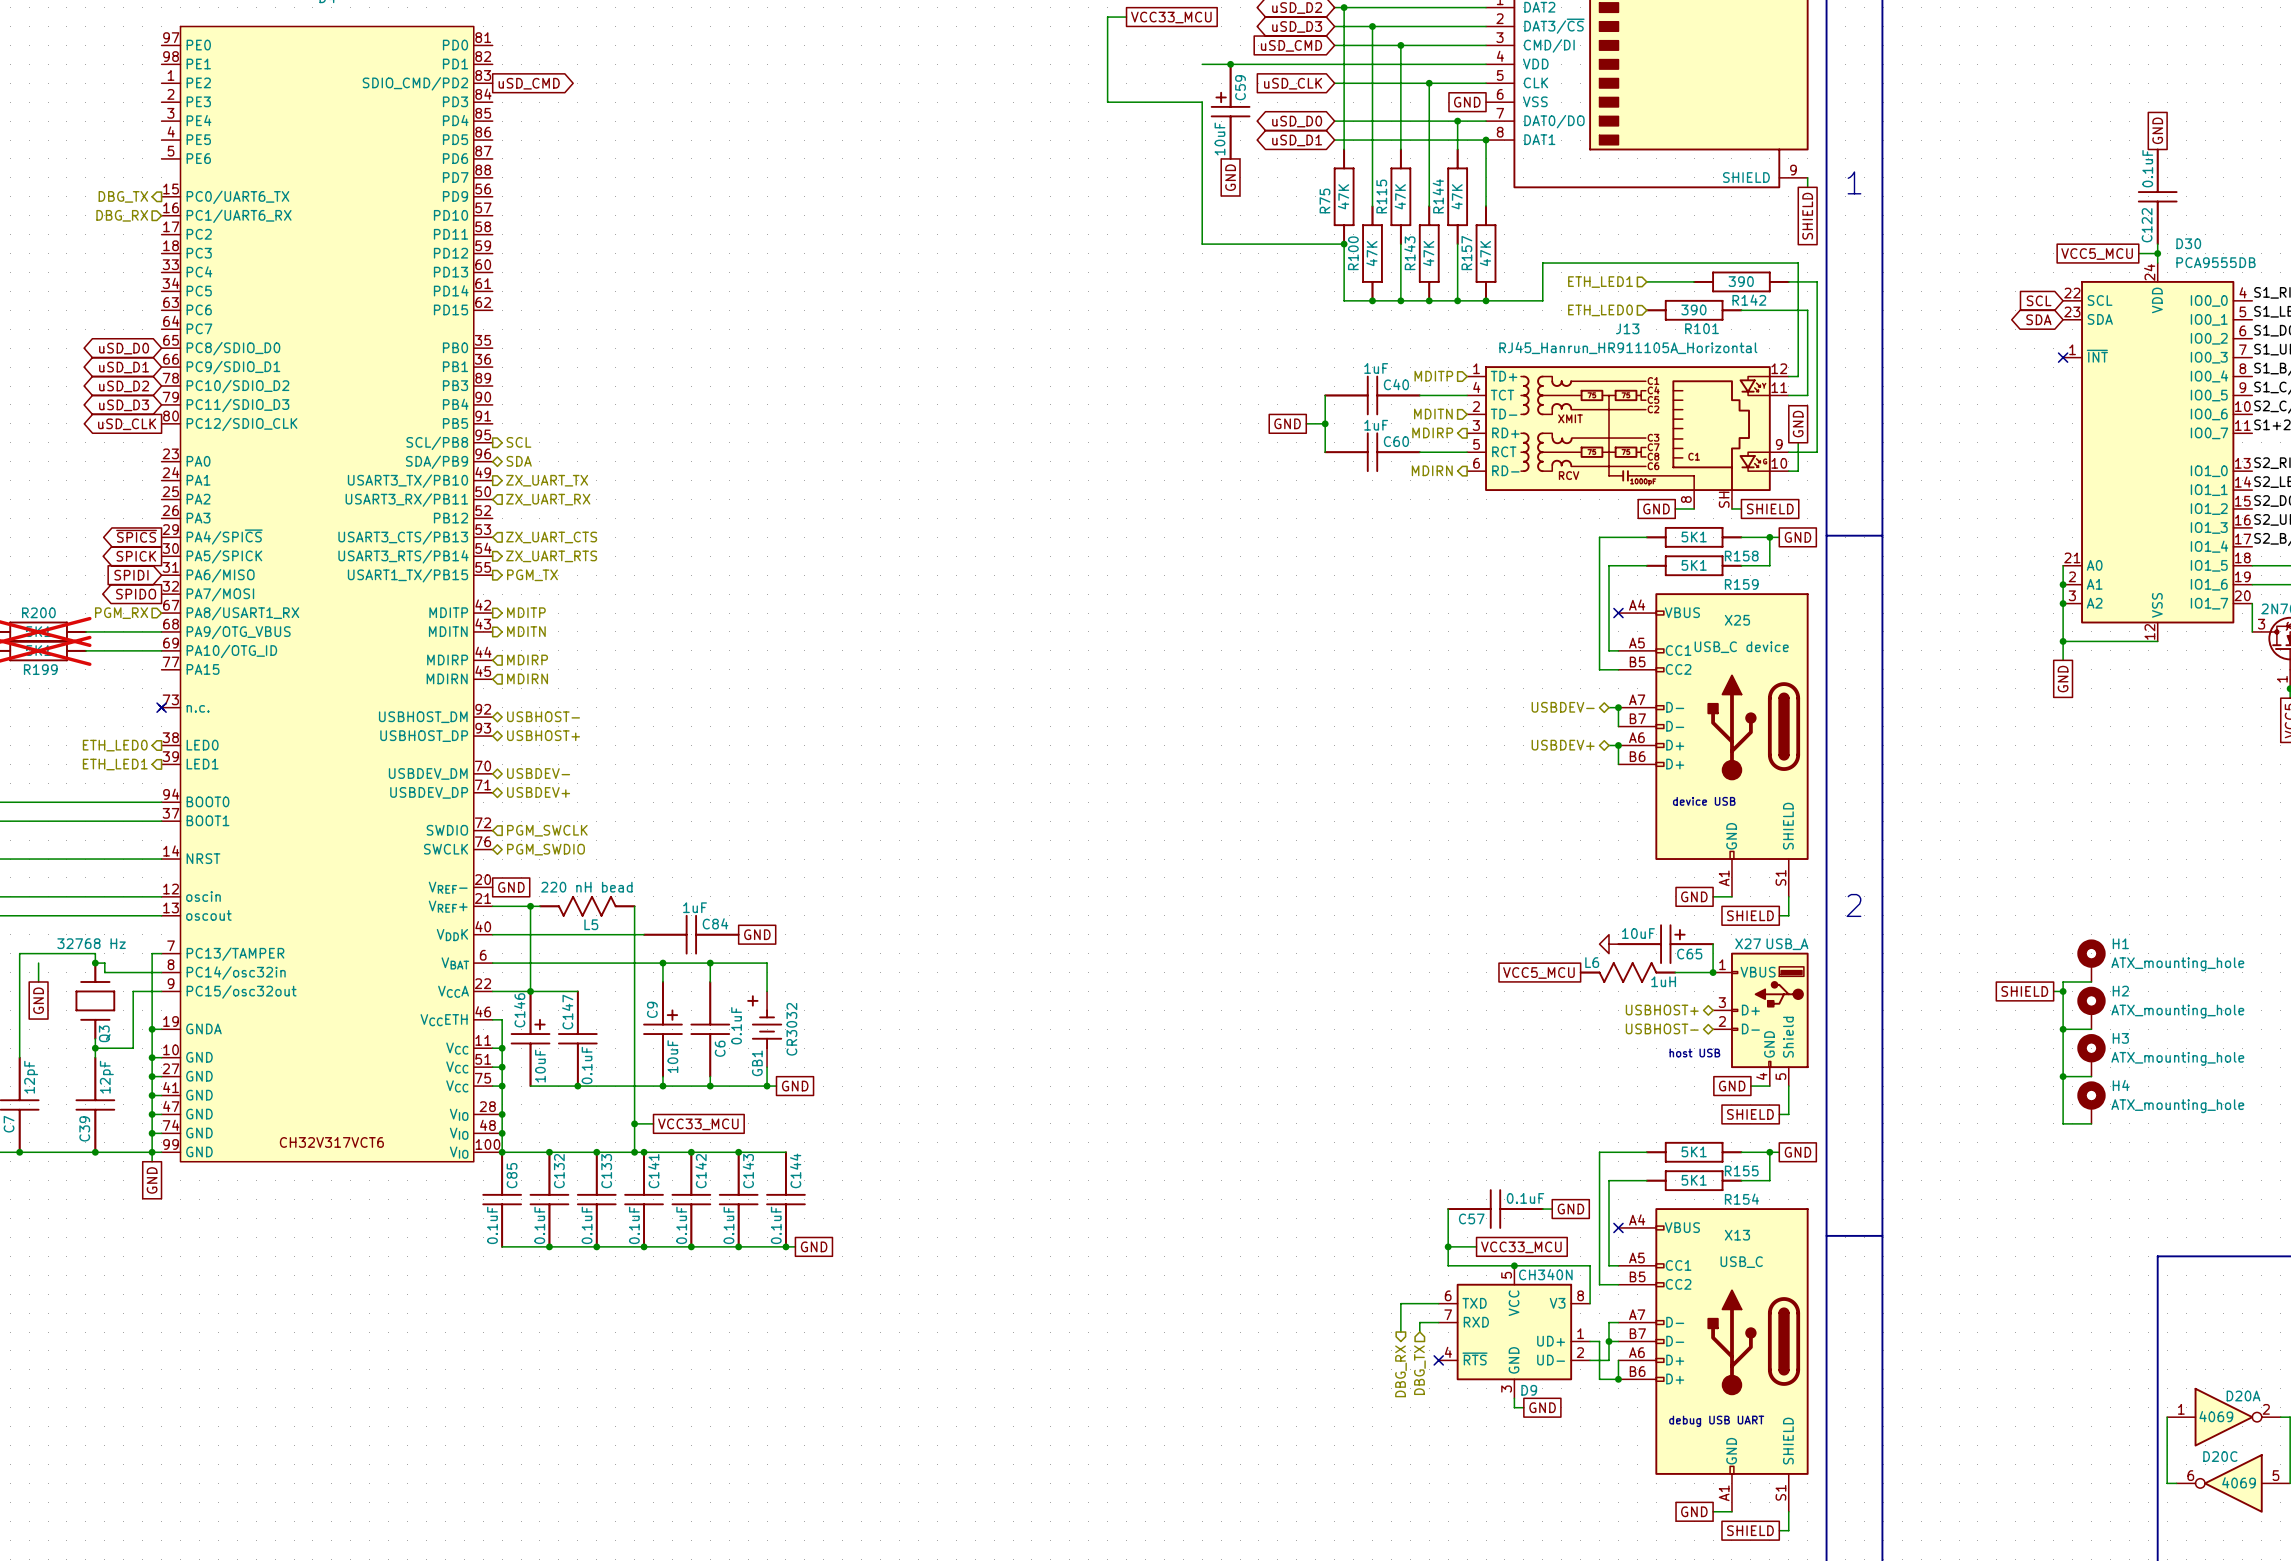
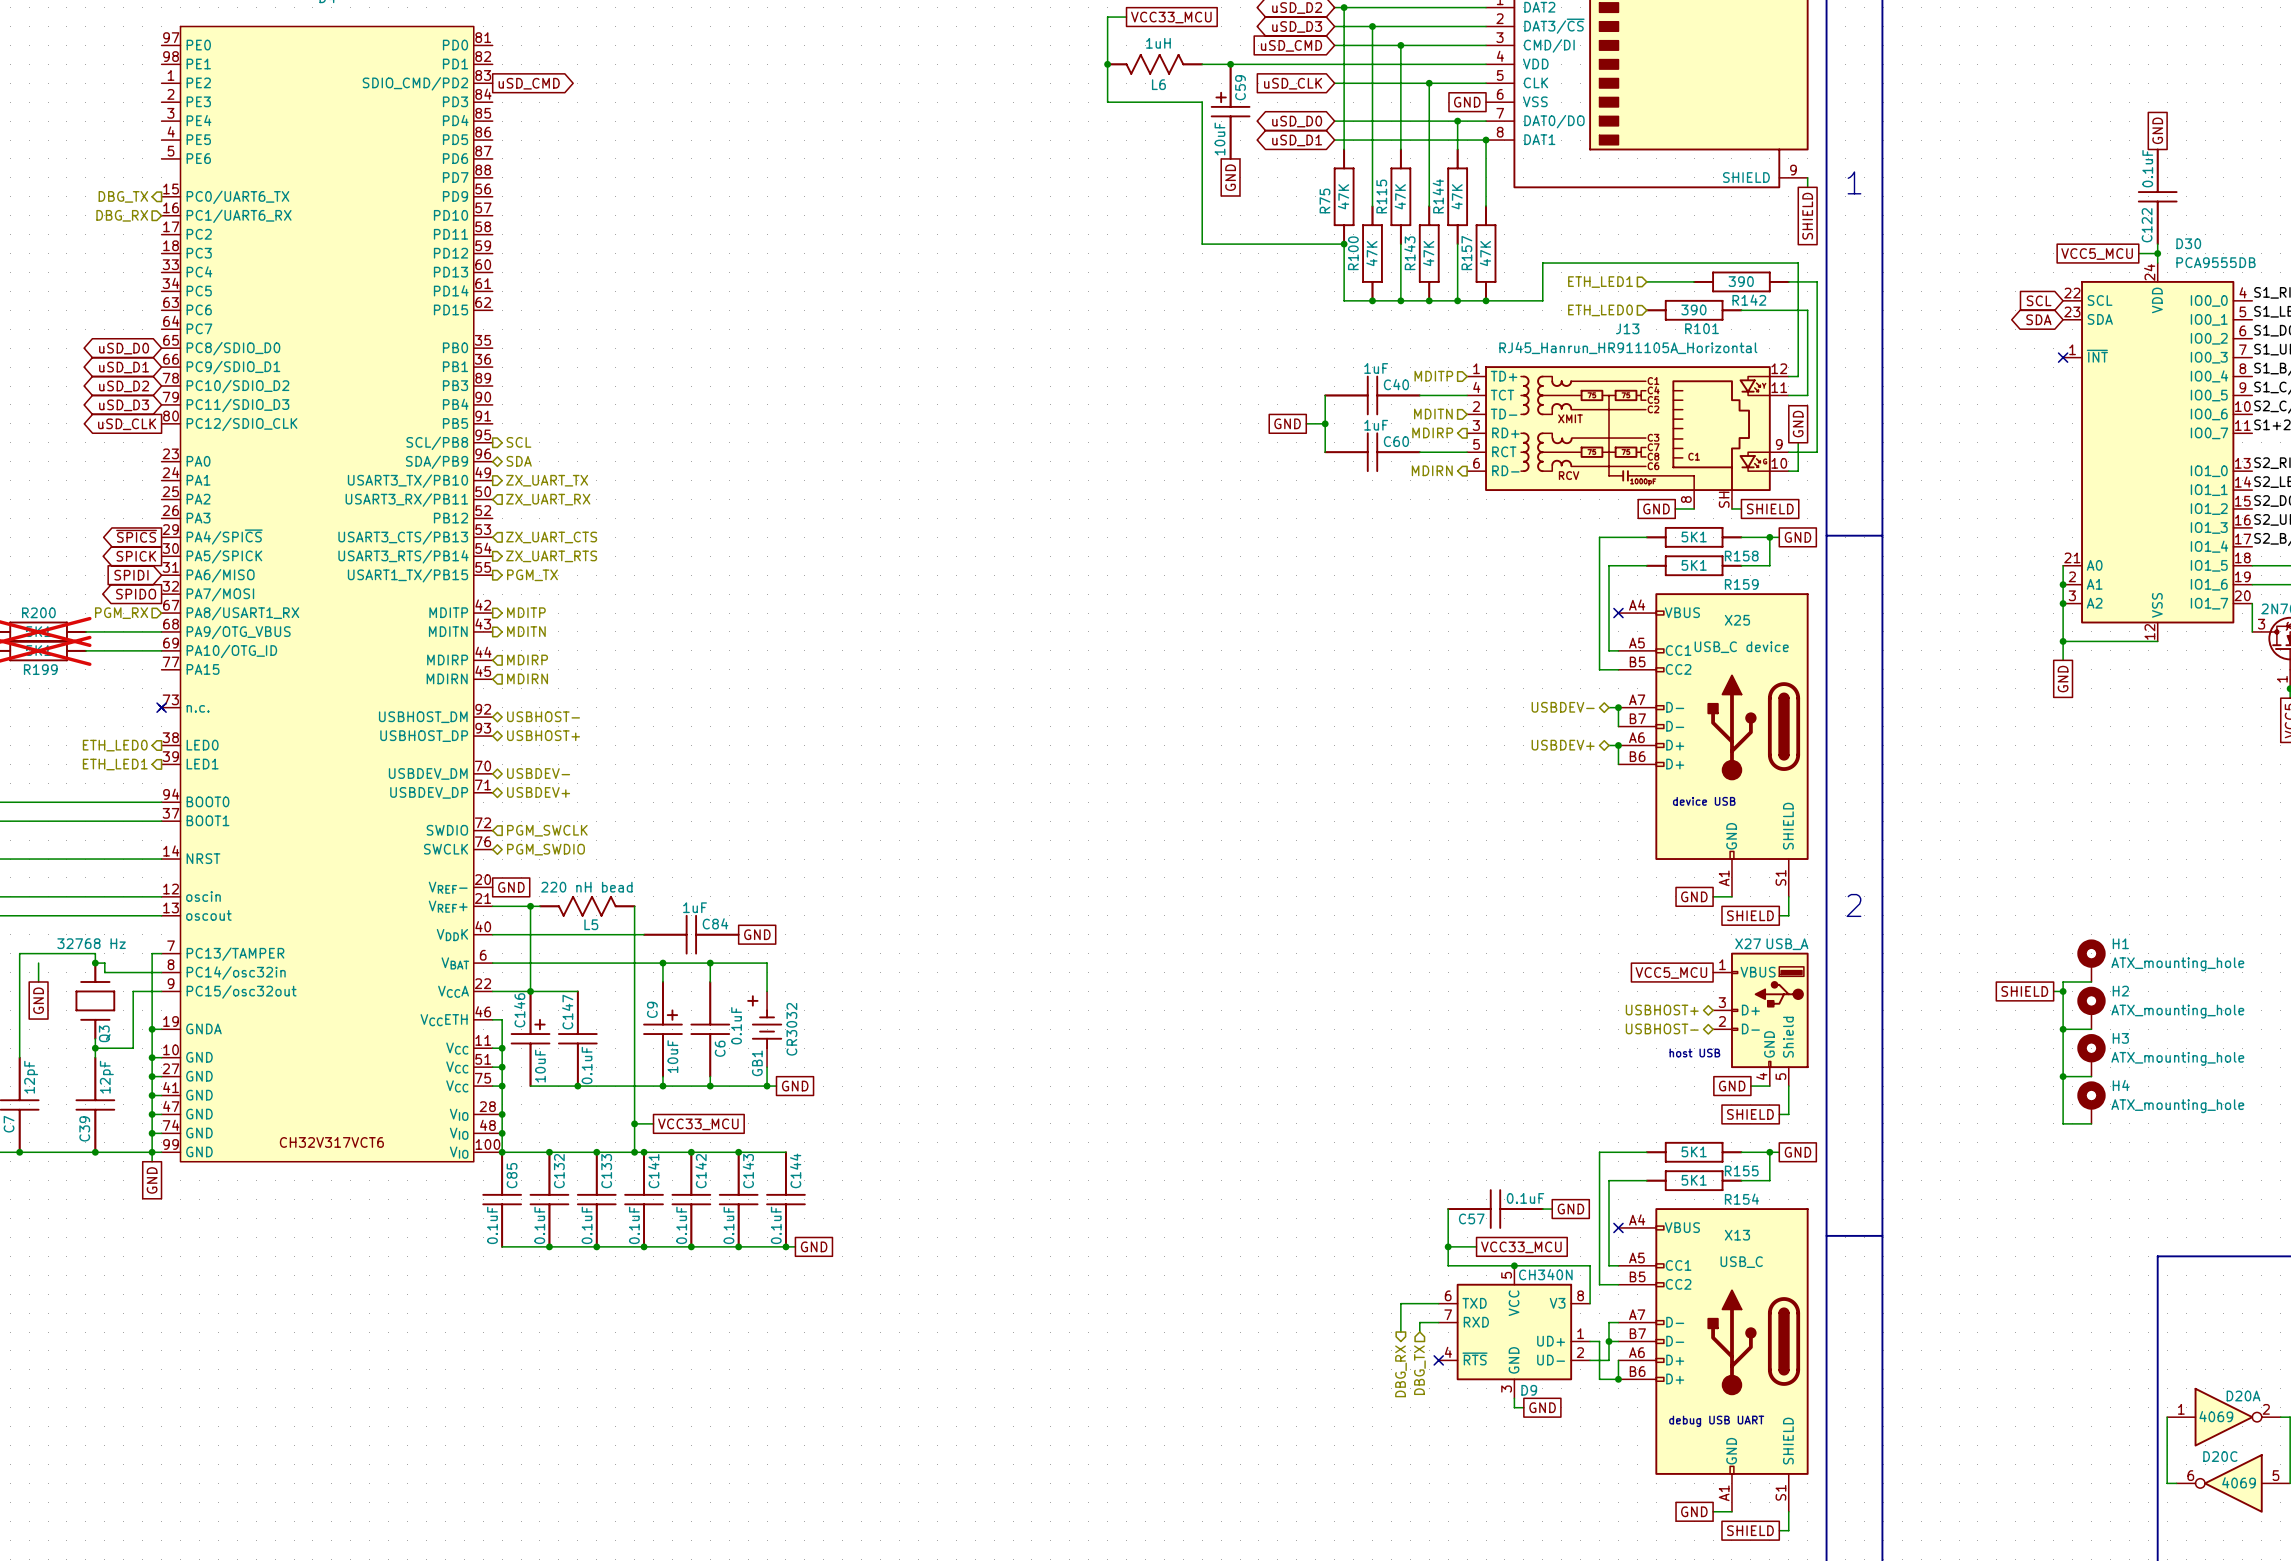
junction: none -> (1107, 64)
power symbol: (1609, 944) -> none
C65: 10uF (1665, 944) -> none
wire: (1713, 944) (1713, 972) (1675, 972) -> none
L6 name position: L6 (1592, 962) -> L6 (1158, 84)
global label position: VCC5_MCU (1538, 972) -> VCC5_MCU (1671, 972)
L6 position: (1627, 972) -> (1154, 64)
junction: (1713, 972) -> none
L6 value position: 1uH (1663, 981) -> 1uH (1158, 43)

